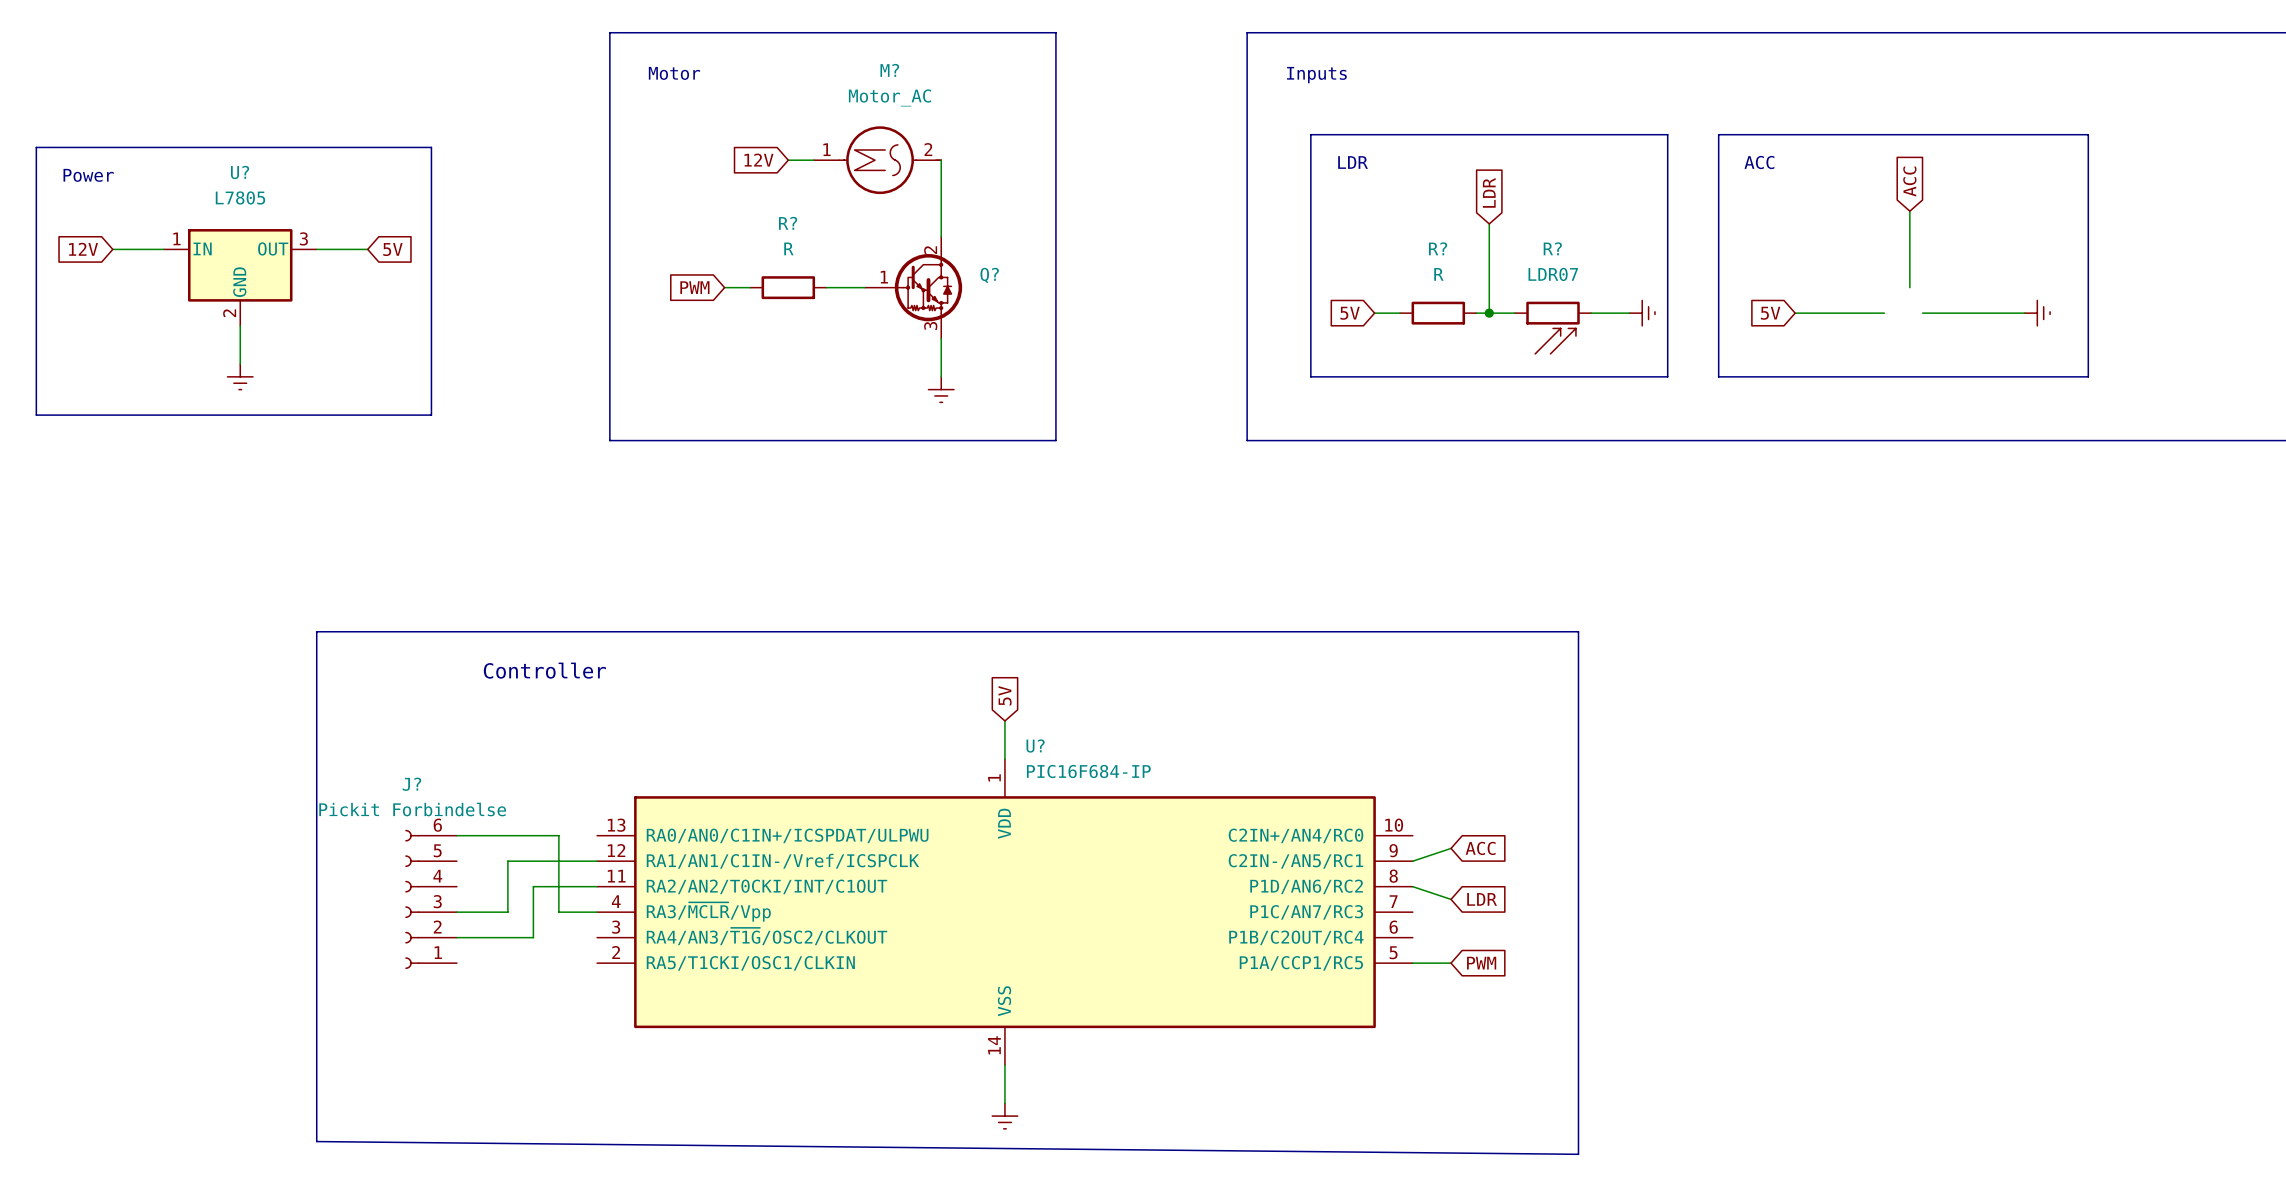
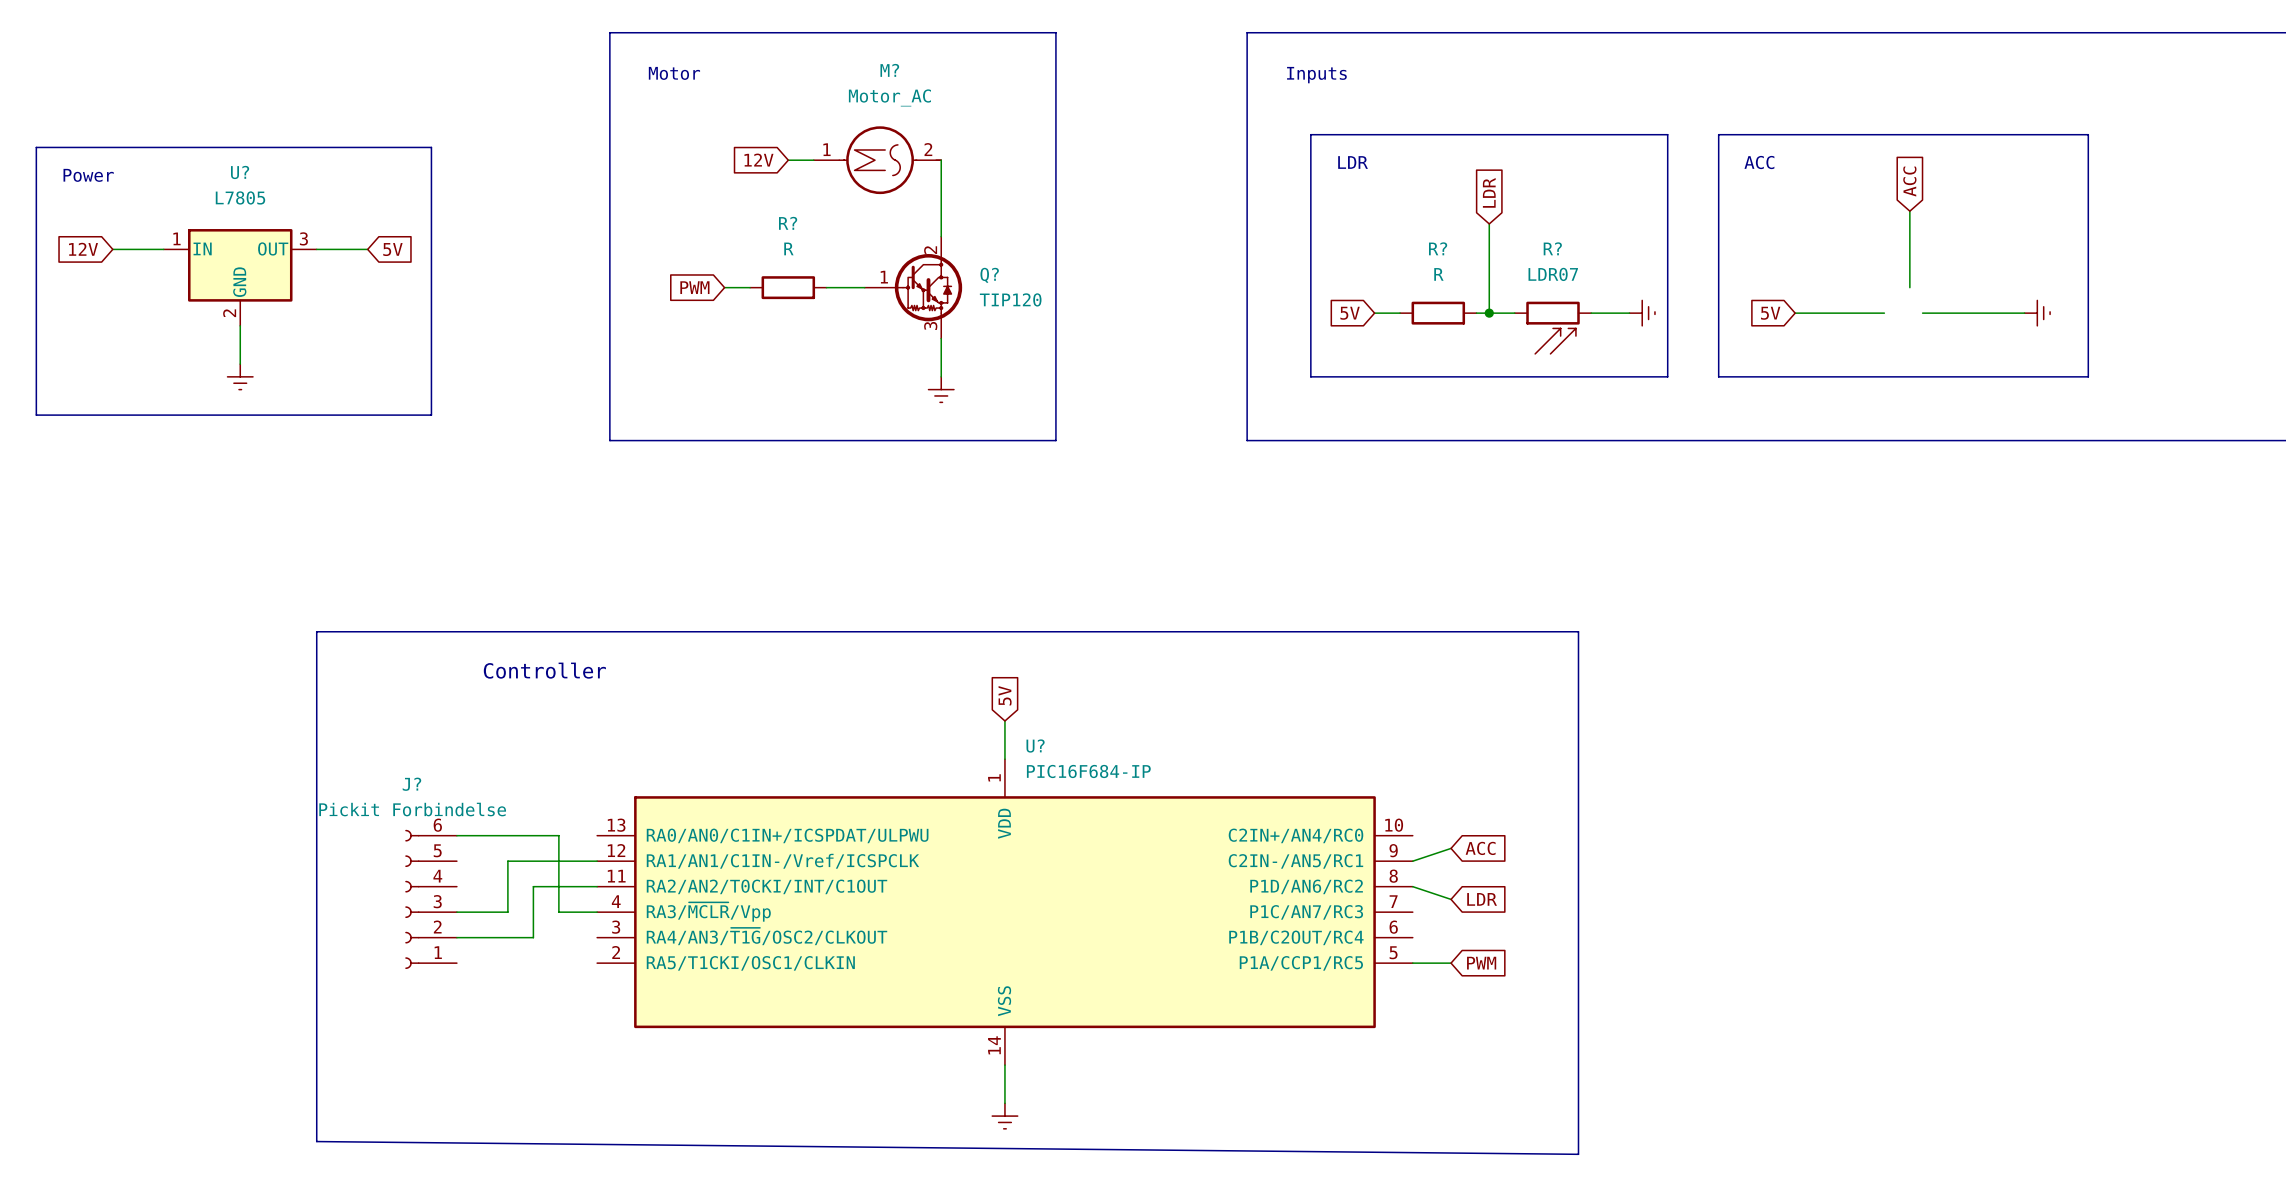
Q? value: none -> TIP120 (1010, 299)

